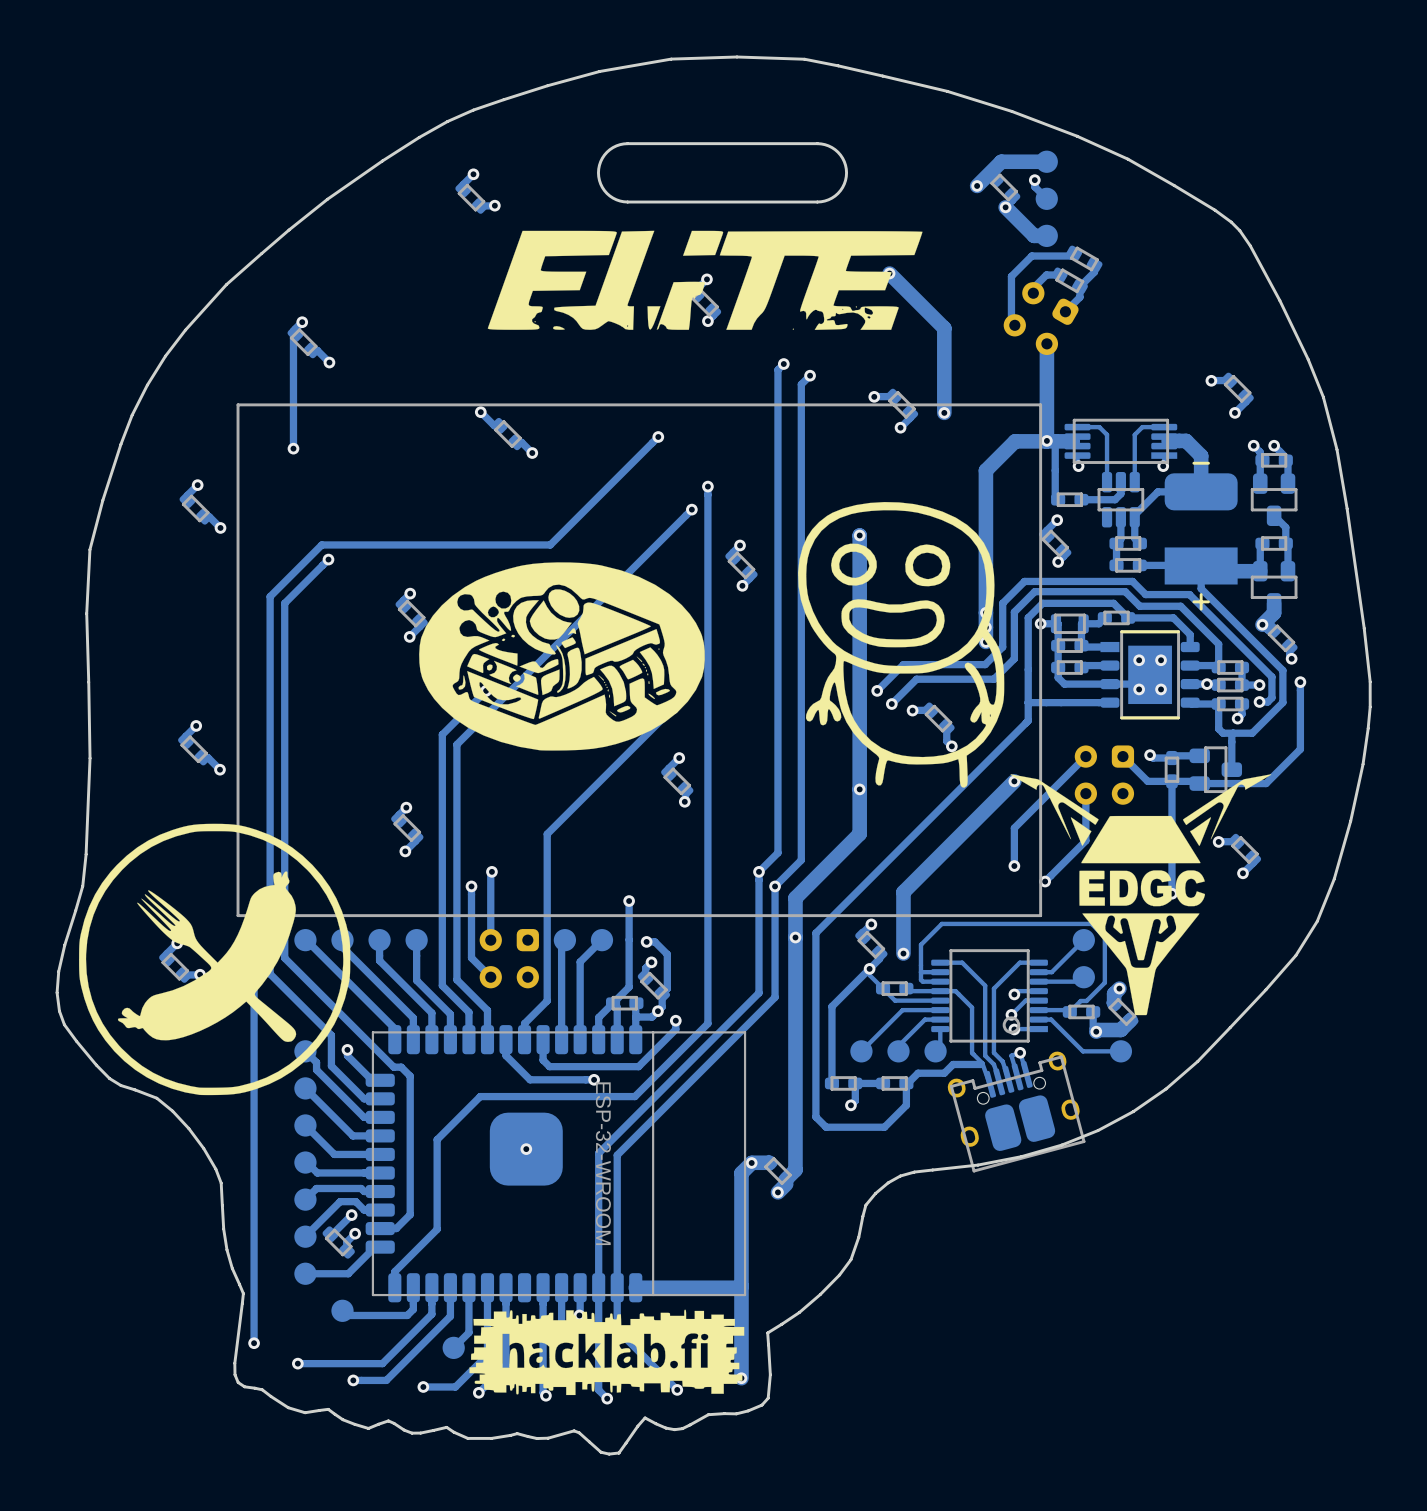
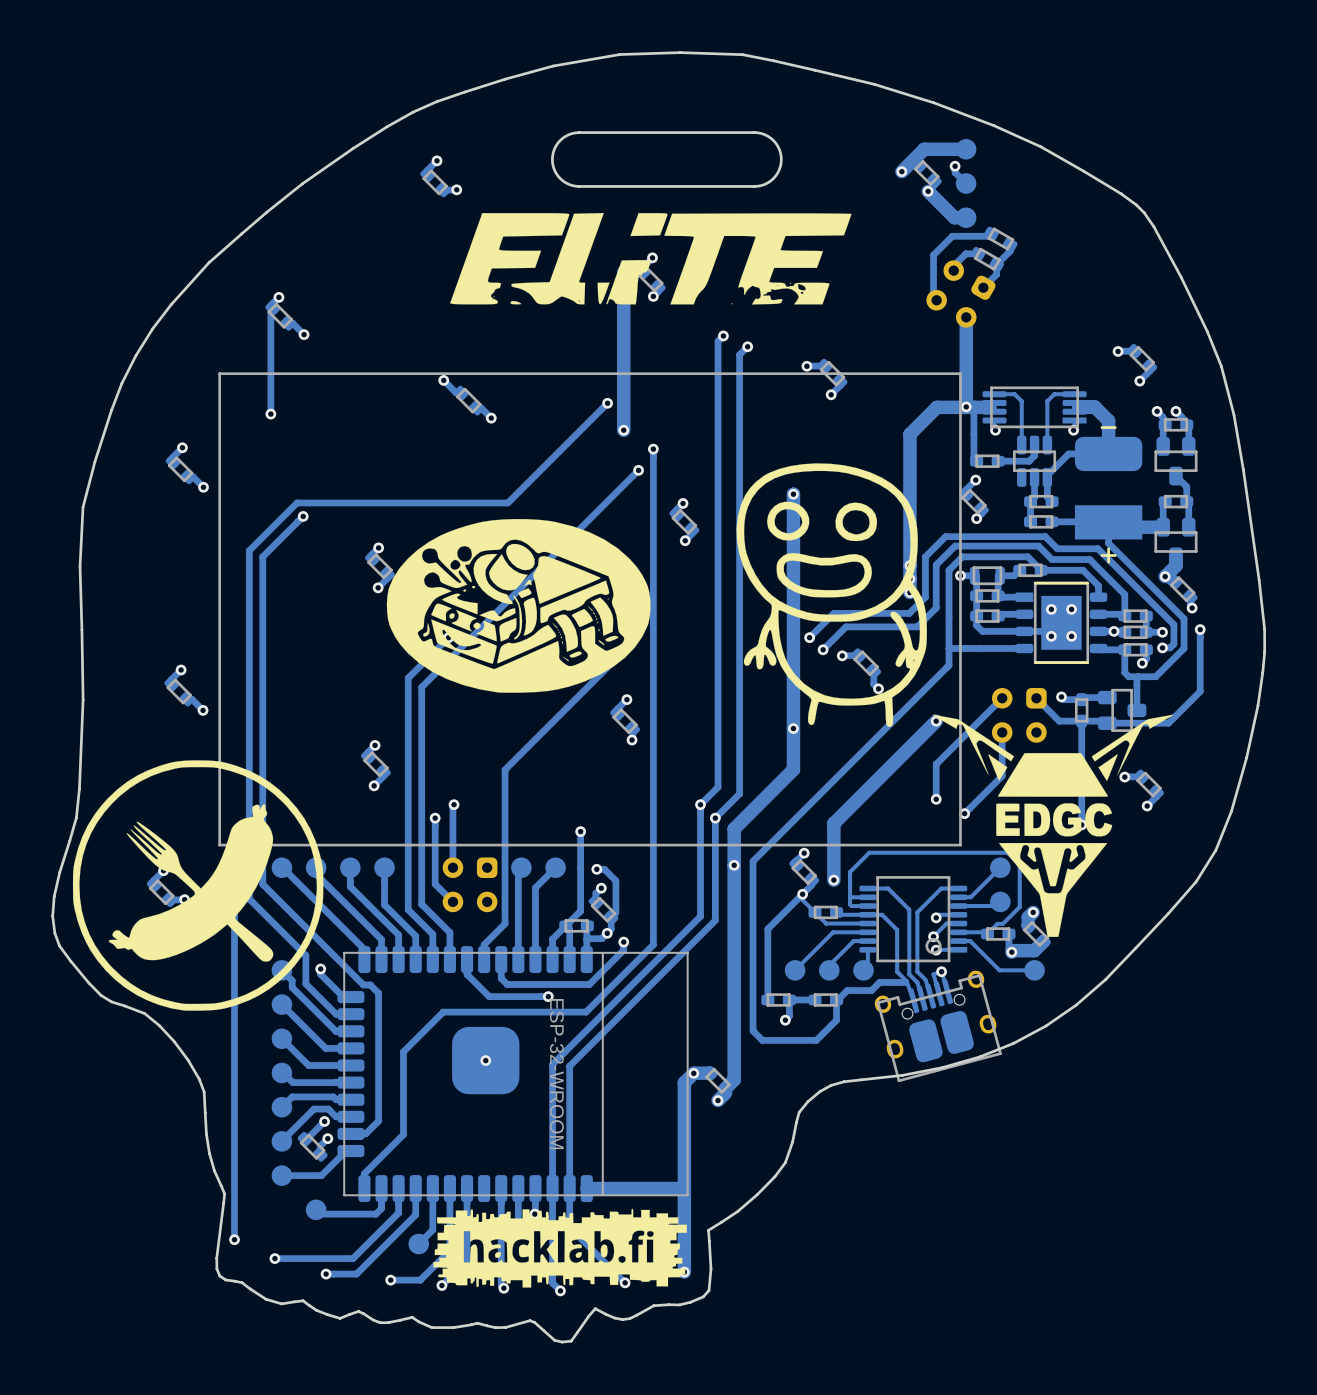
track: (889, 273) (944, 328) (944, 412) -> none
via: (889, 273) -> none
track: none -> (623, 271) (623, 430)
via: (944, 412) -> none
via: none -> (623, 430)

